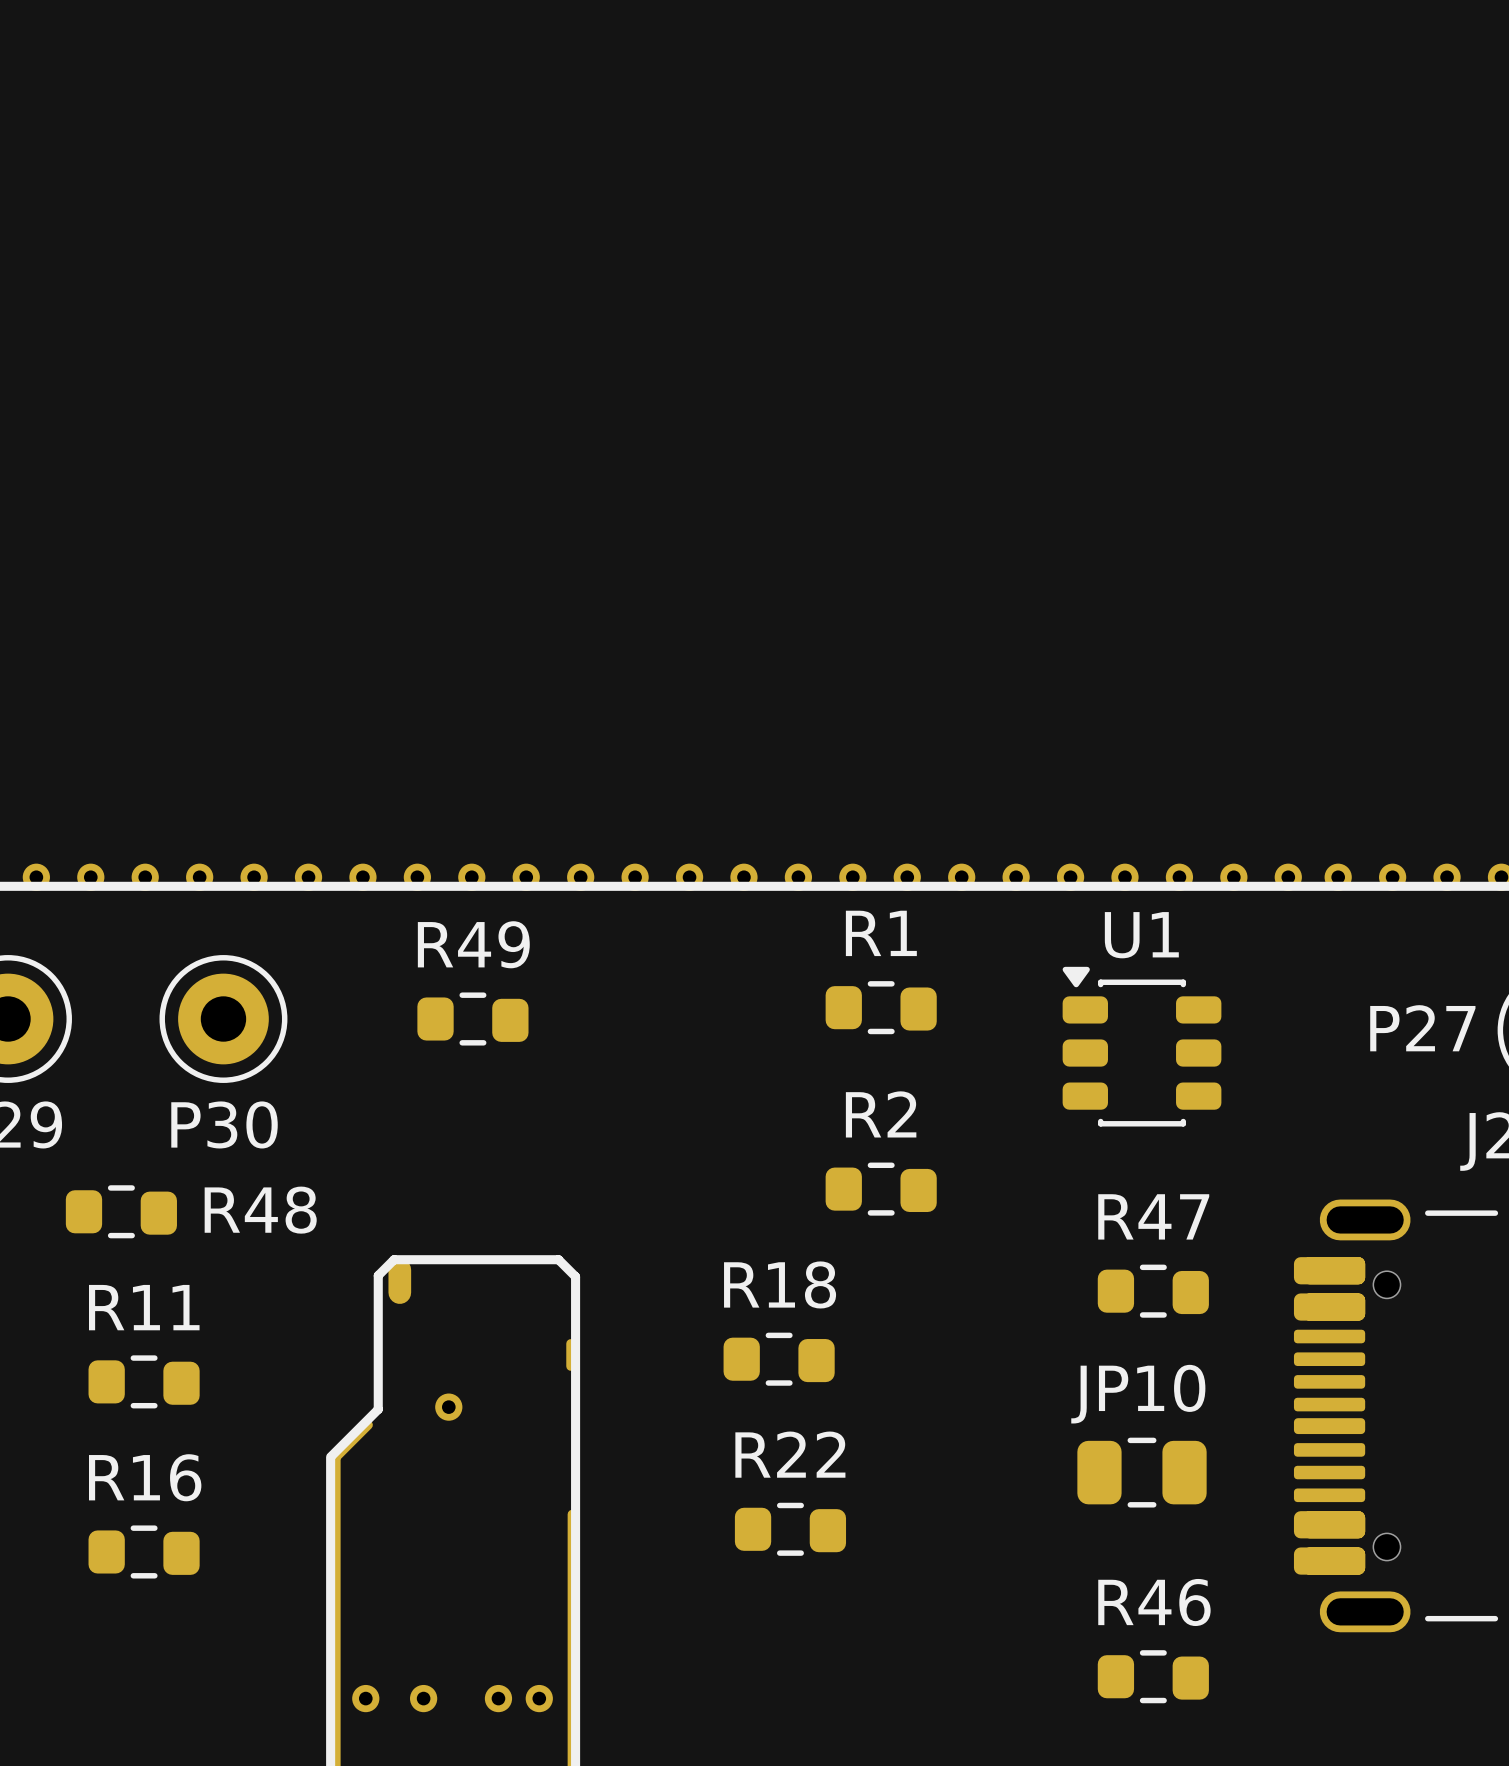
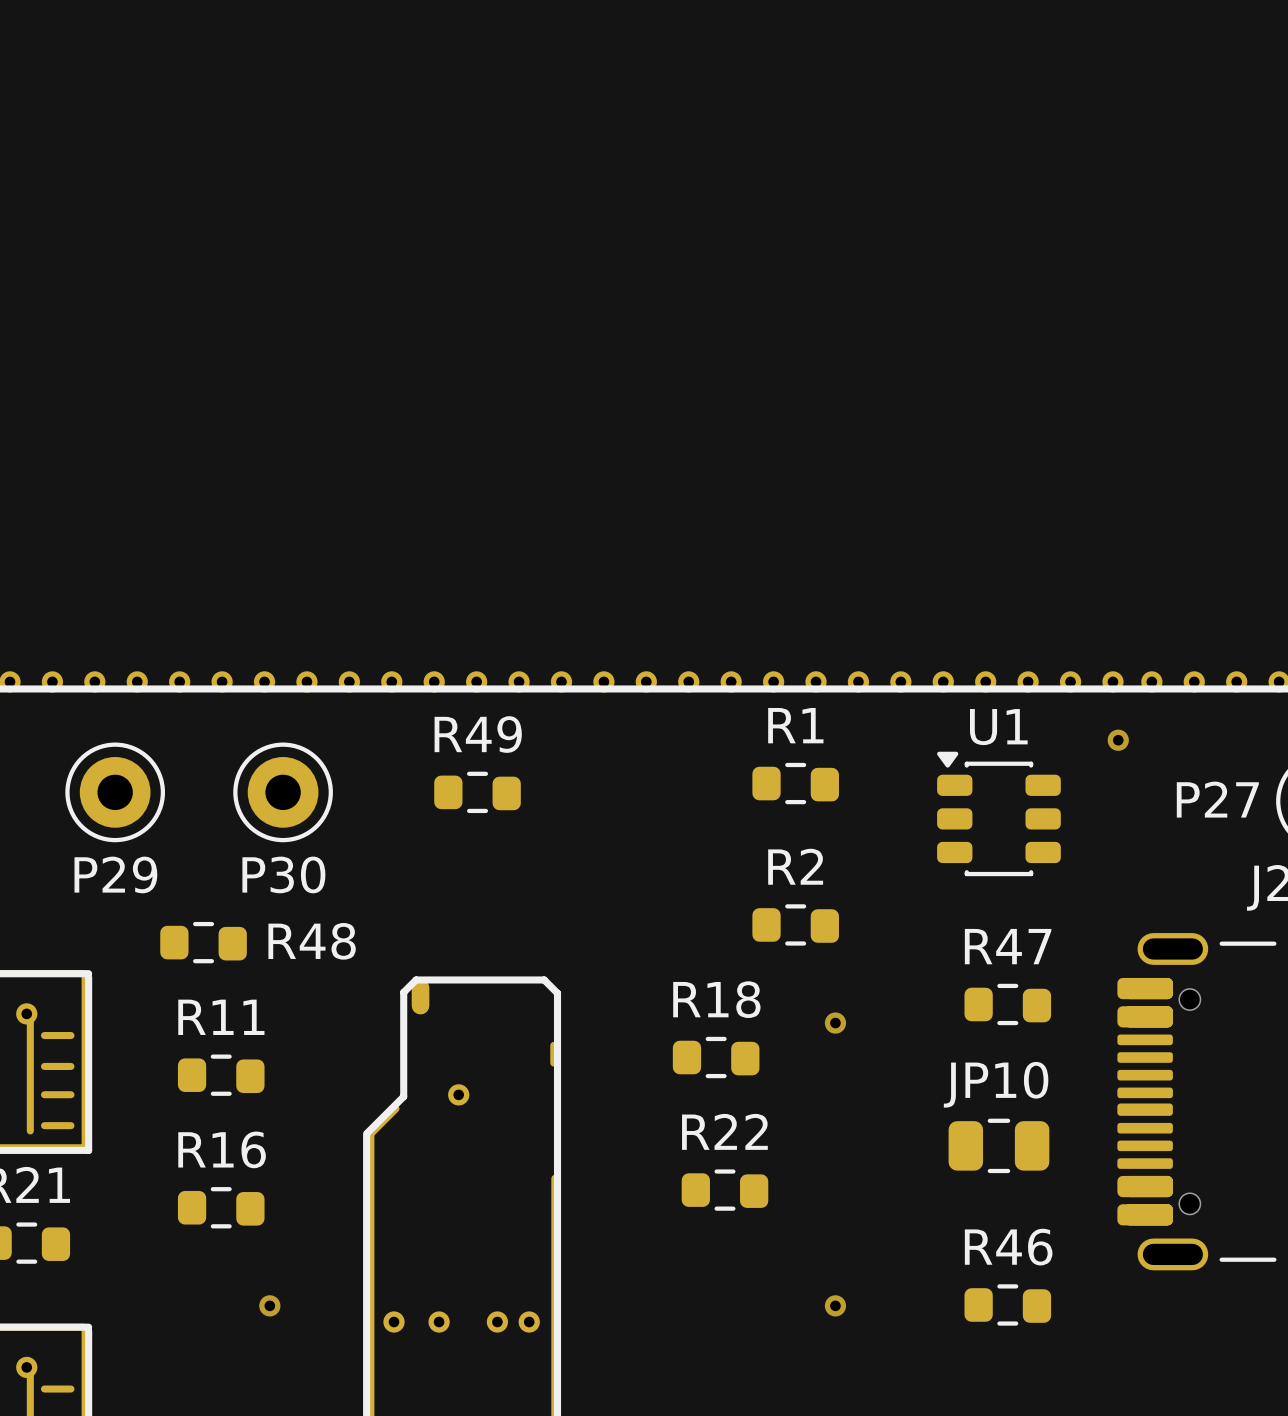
via: none -> (1118, 740)
via: none -> (835, 1023)
via: none -> (269, 1305)
via: none -> (835, 1305)

